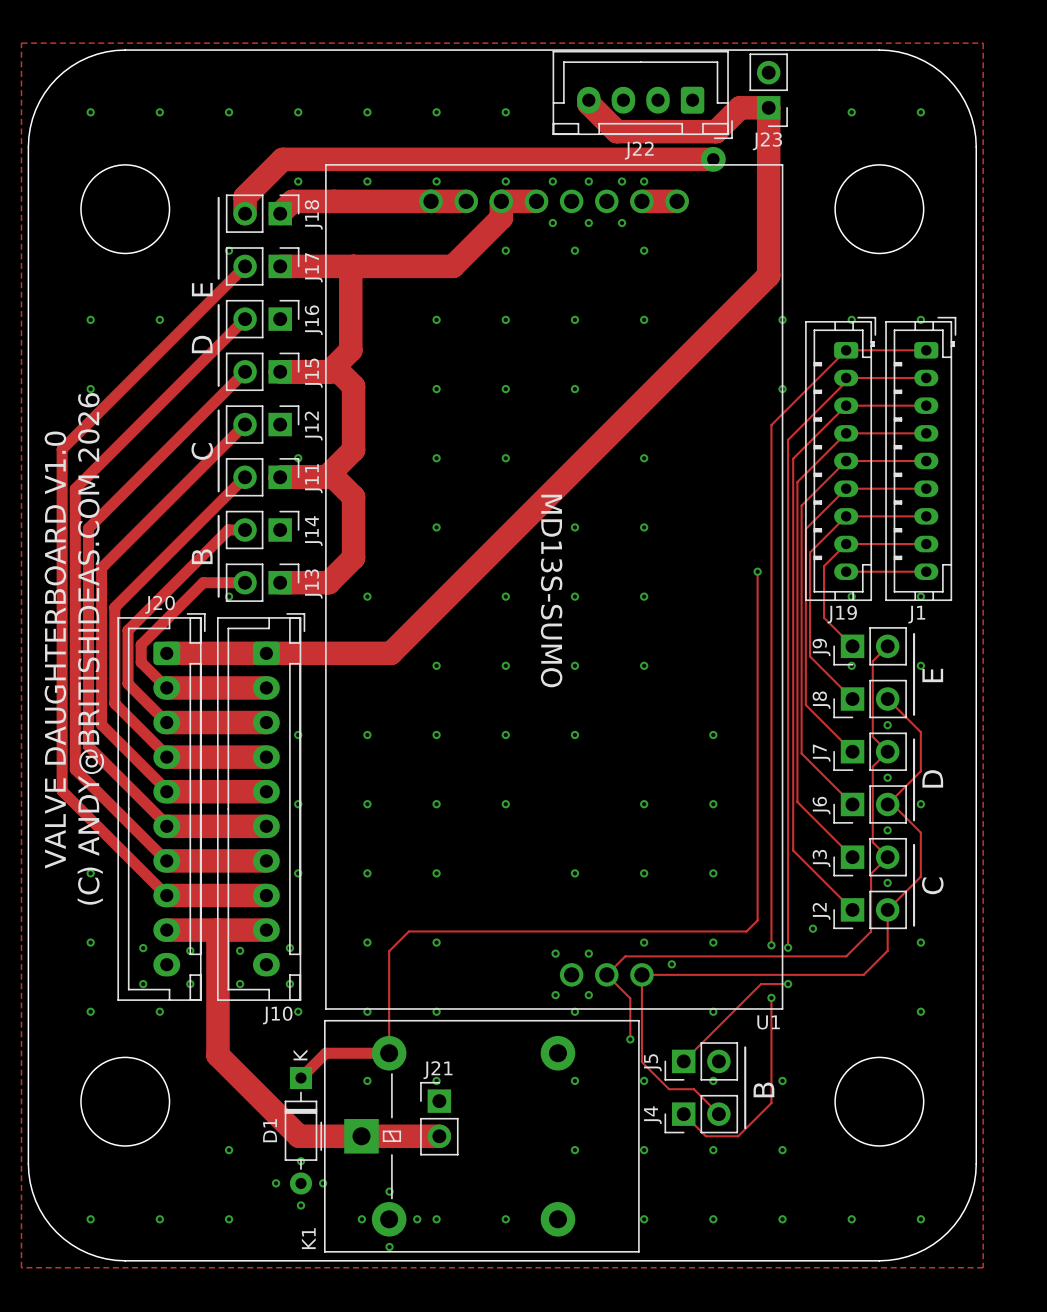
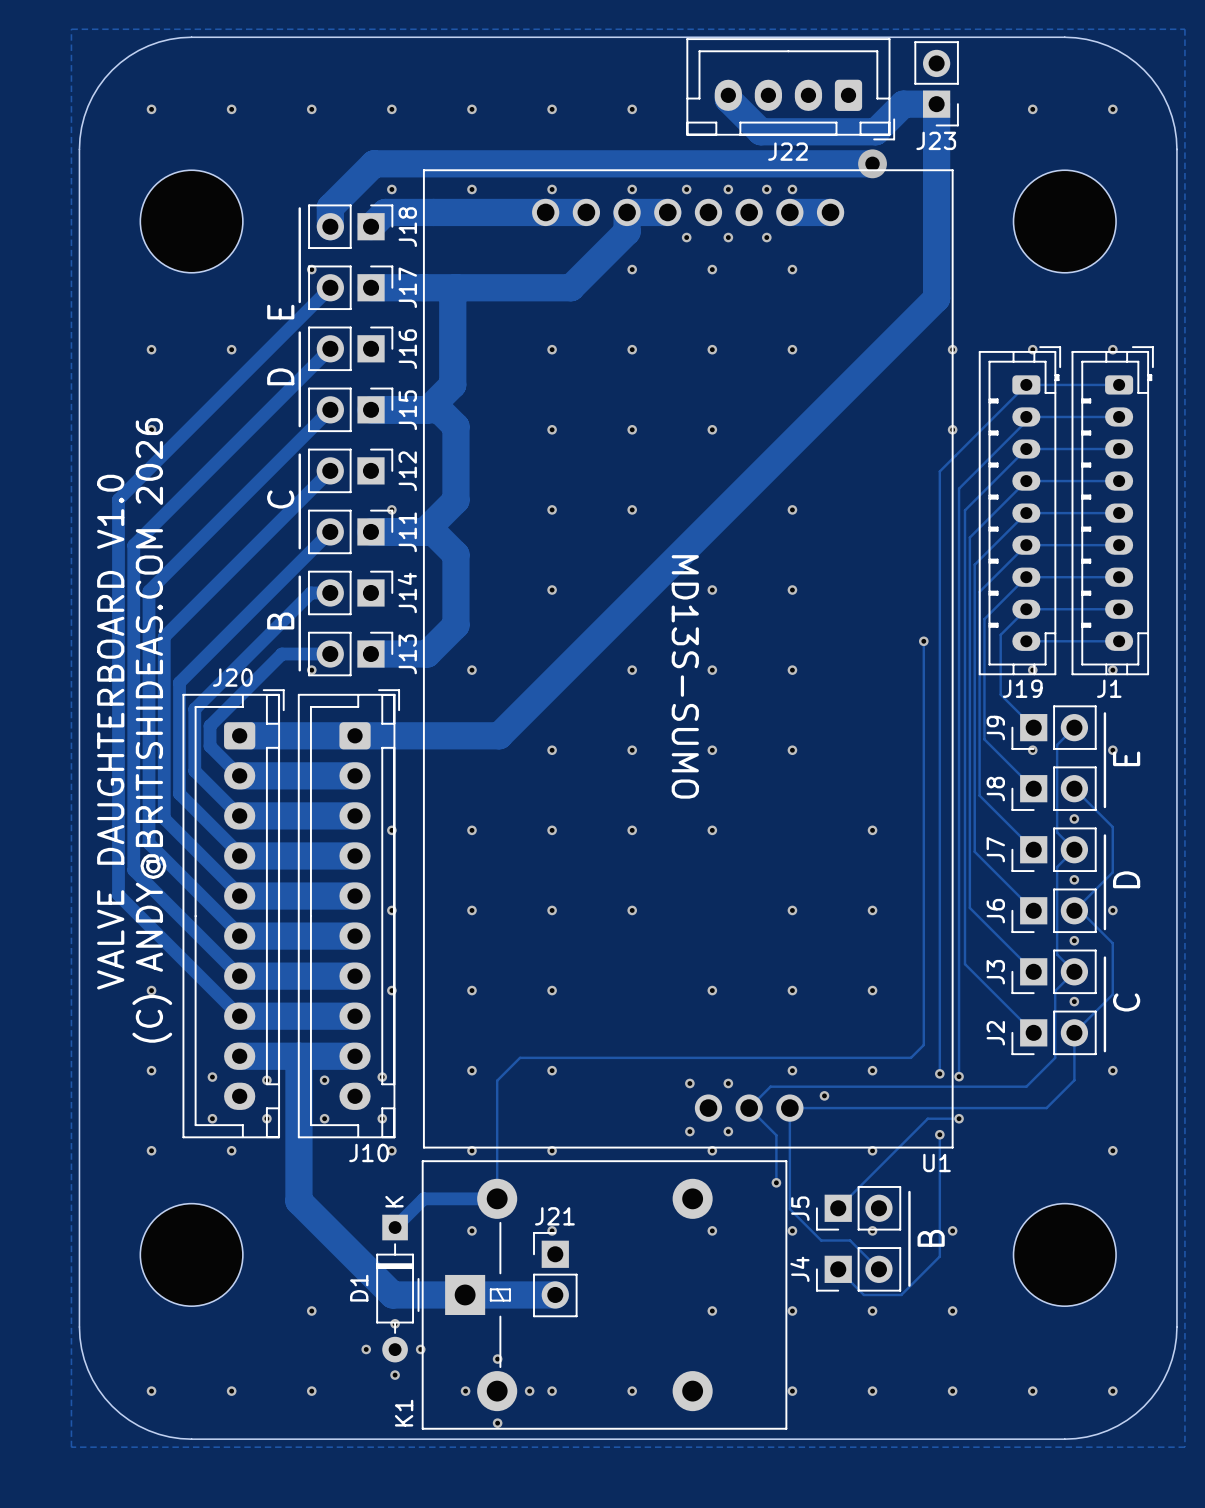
via: (812, 928) -> none

